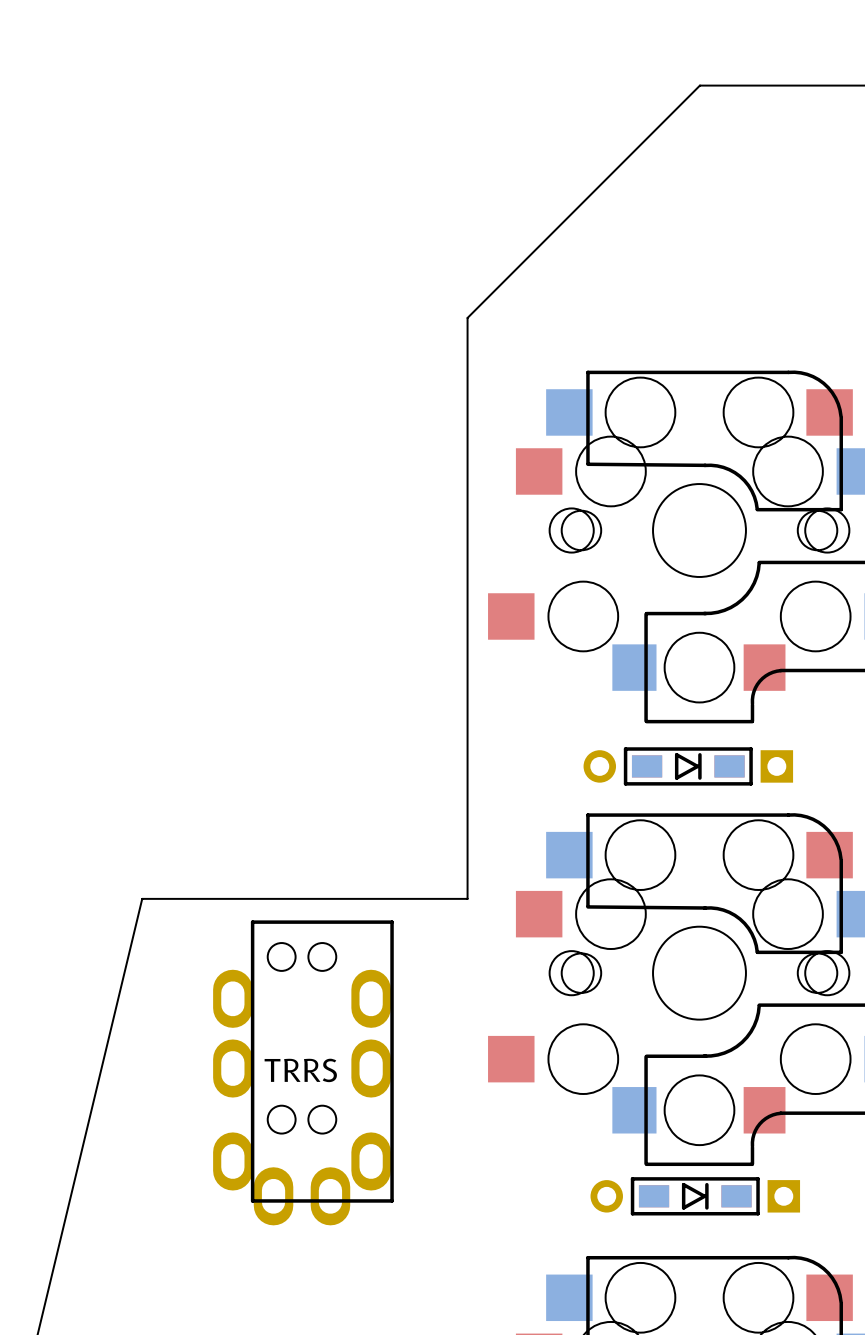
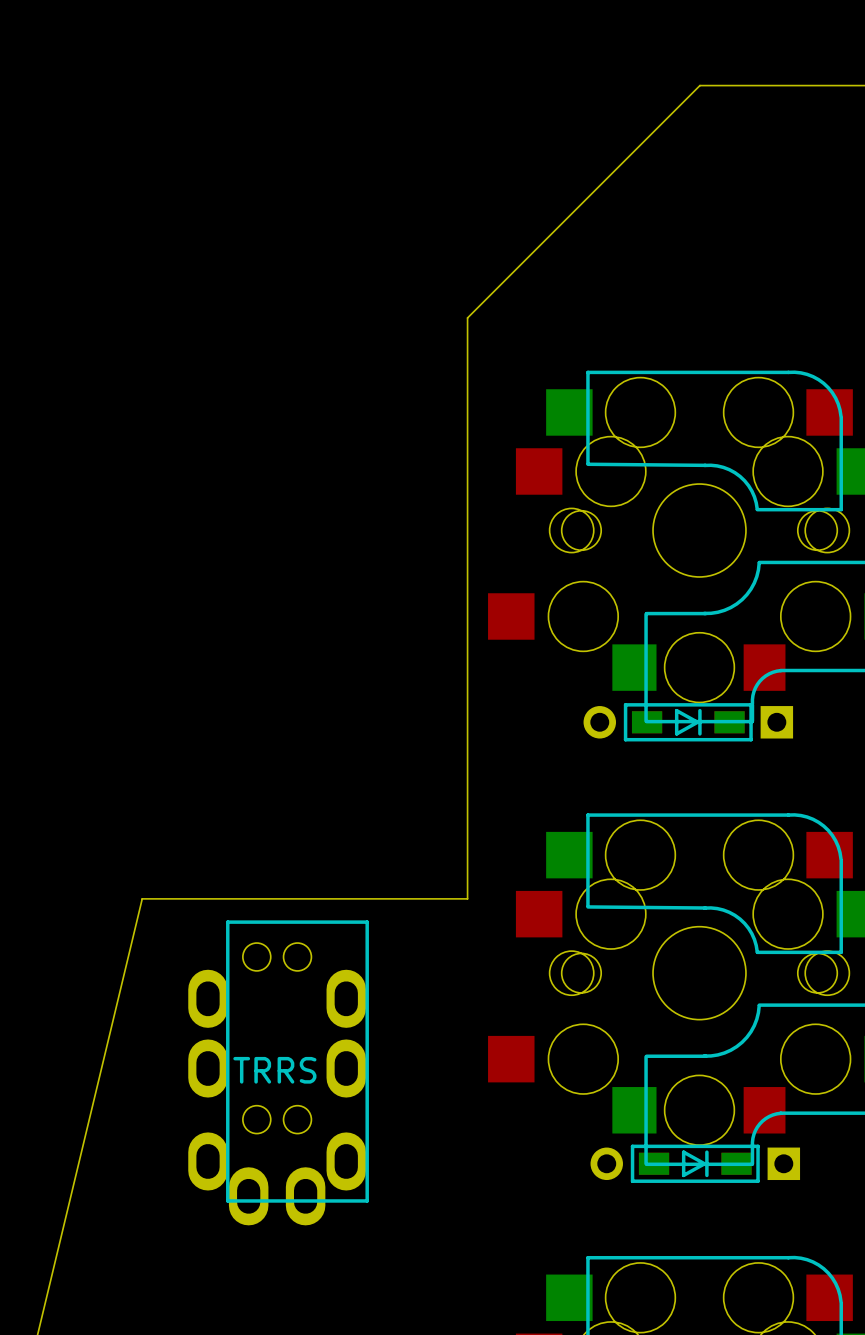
part position: (688, 766) -> (688, 722)
part position: (303, 1072) -> (278, 1072)
part position: (695, 1196) -> (695, 1163)

